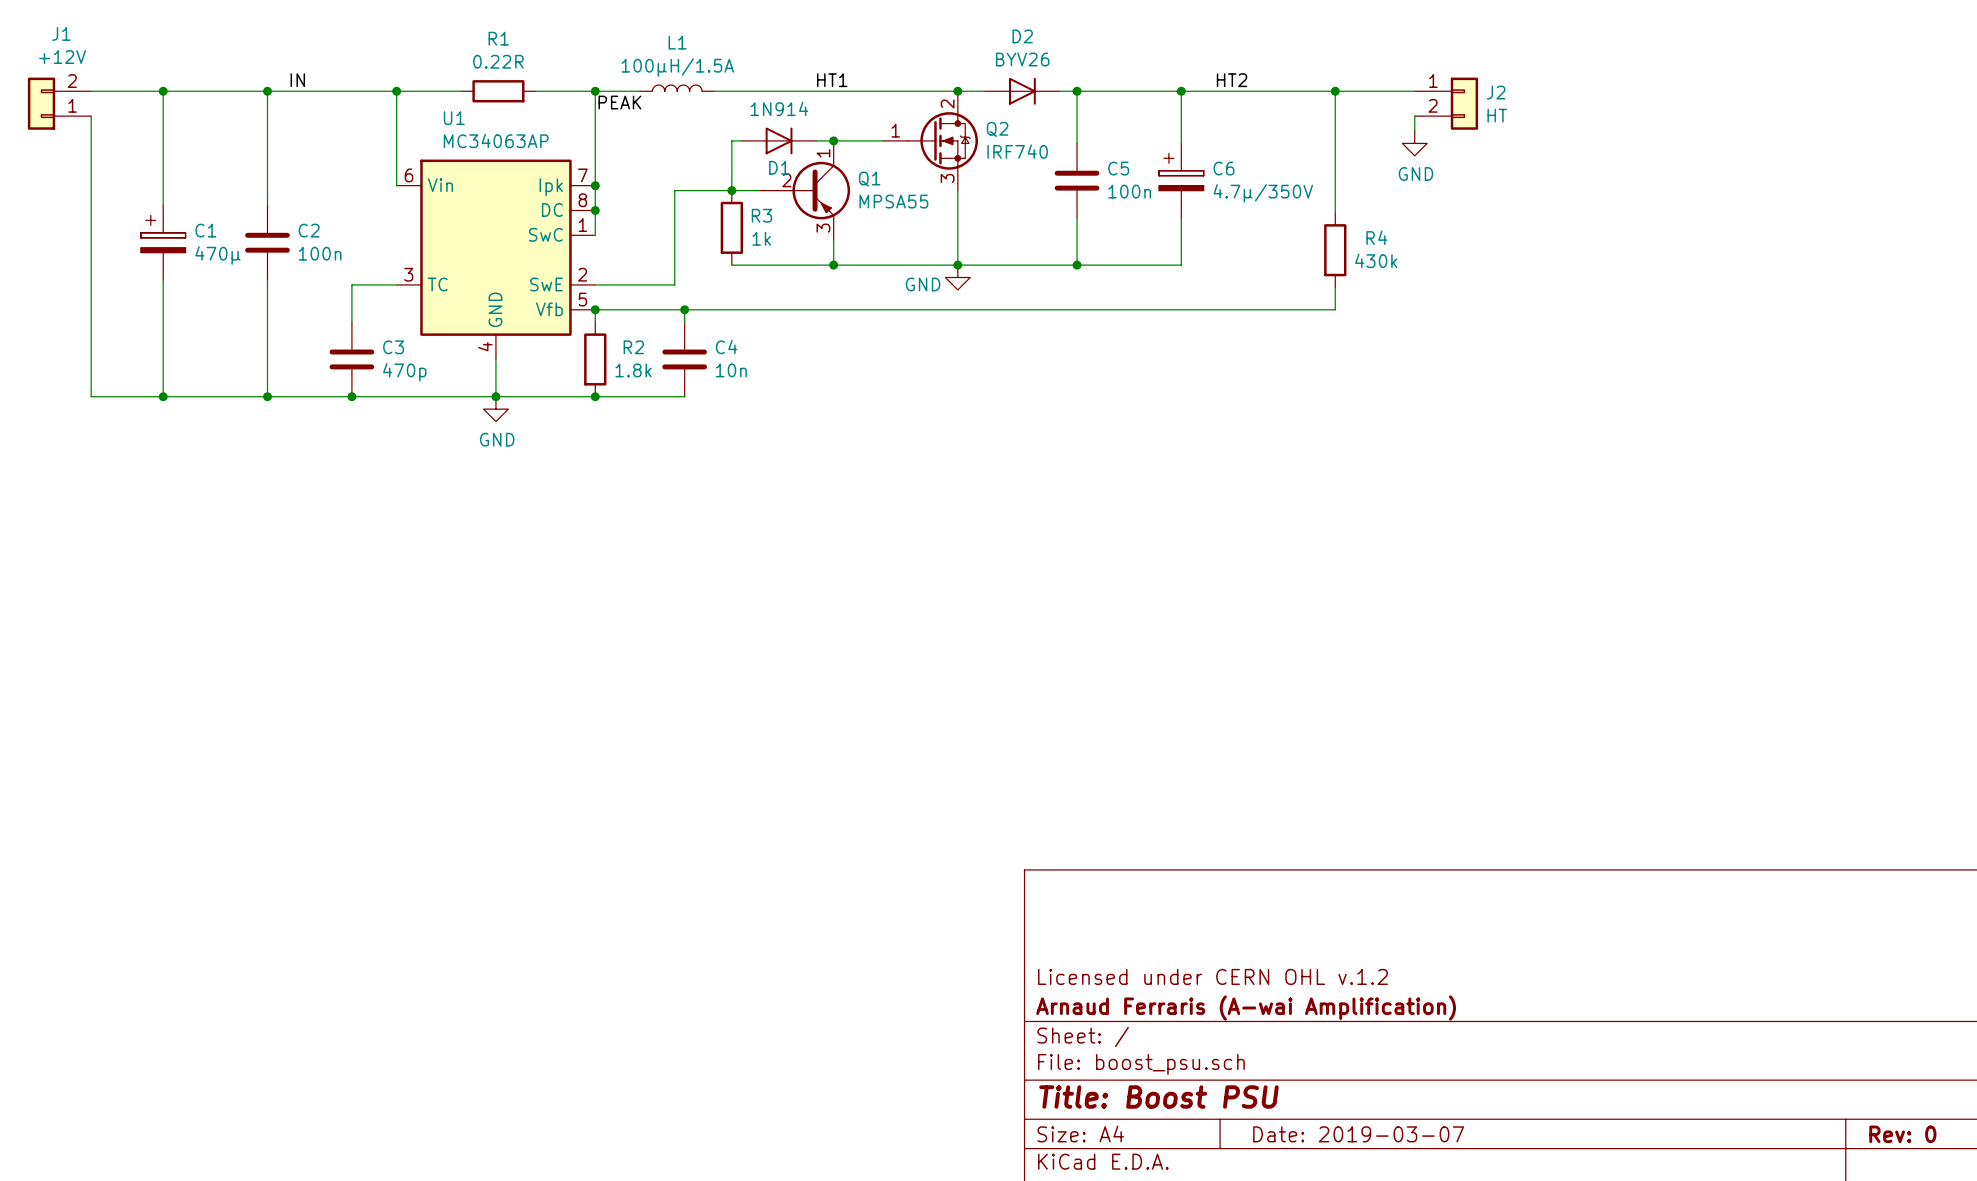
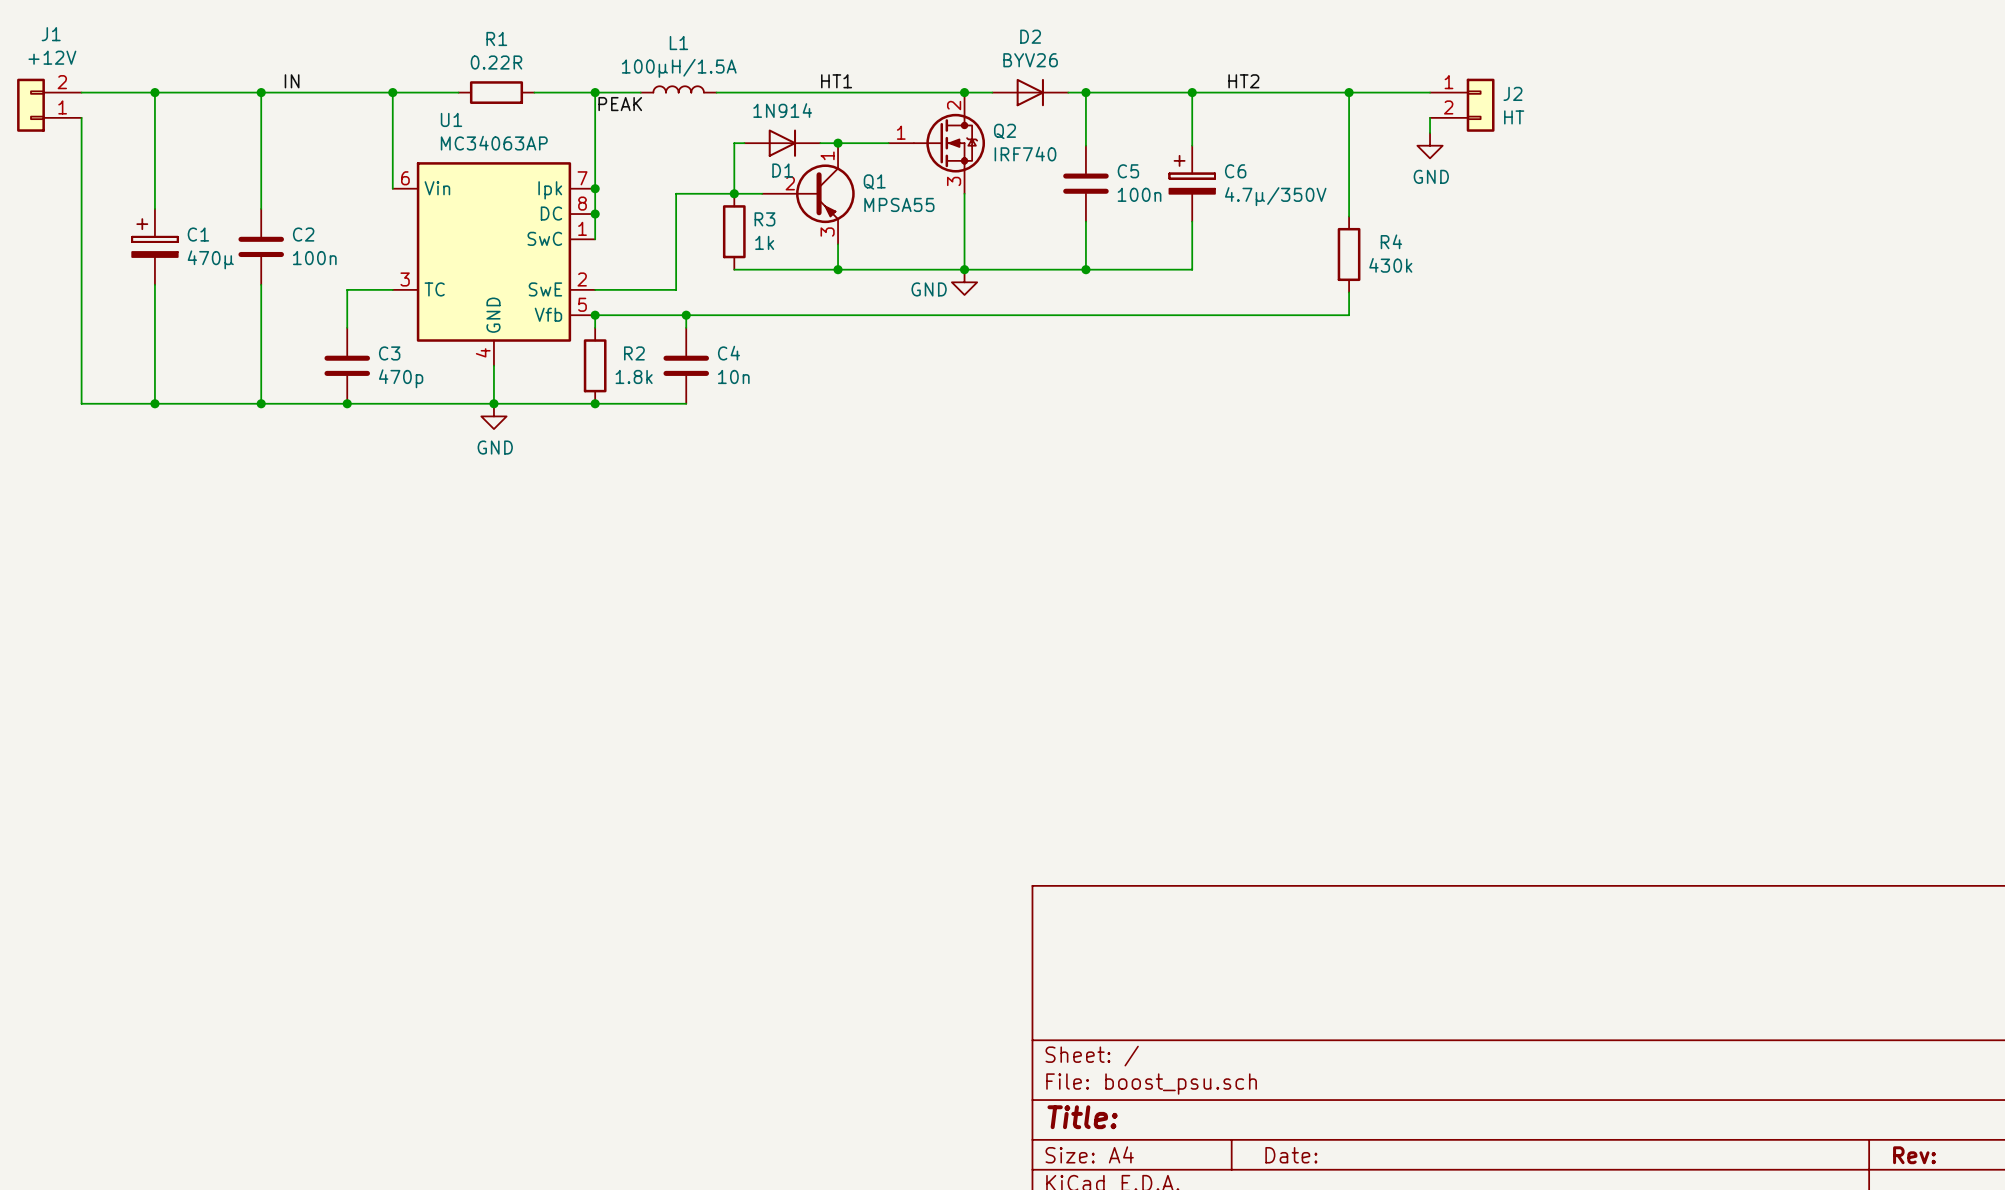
title block: Licensed under CERN OHL v.1.2 (1213, 976) -> none
title block: Arnaud Ferraris (A-wai Amplification) (1246, 1008) -> none
title block: Title: Boost PSU (1158, 1097) -> Title: (1082, 1117)
title block: Date: 2019-03-07 (1358, 1134) -> Date: (1291, 1155)
title block: Rev: 0 (1902, 1134) -> Rev: (1914, 1155)

